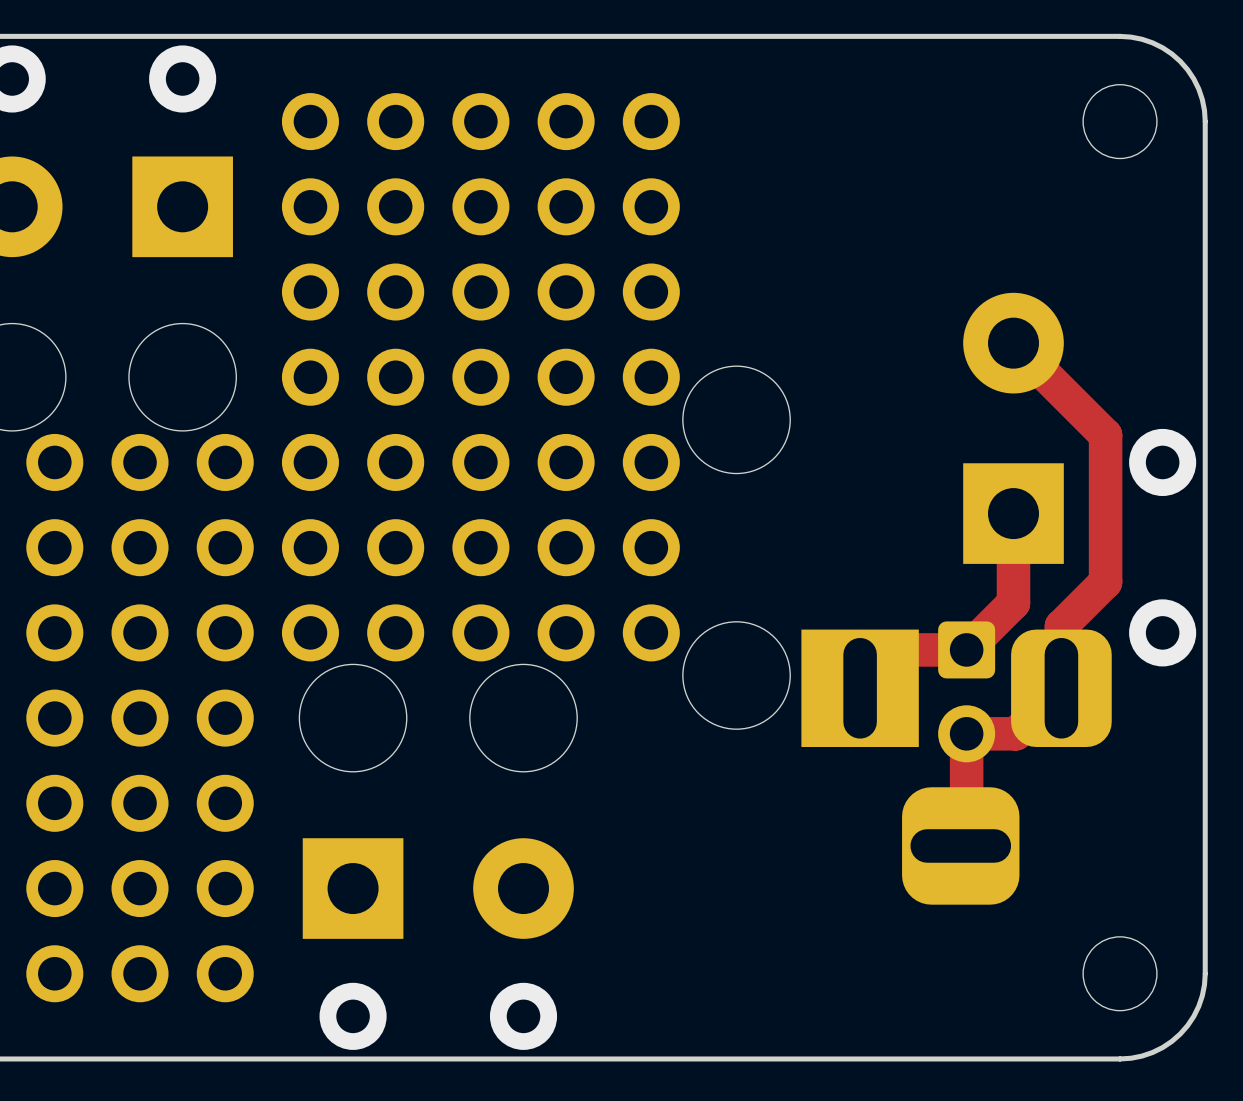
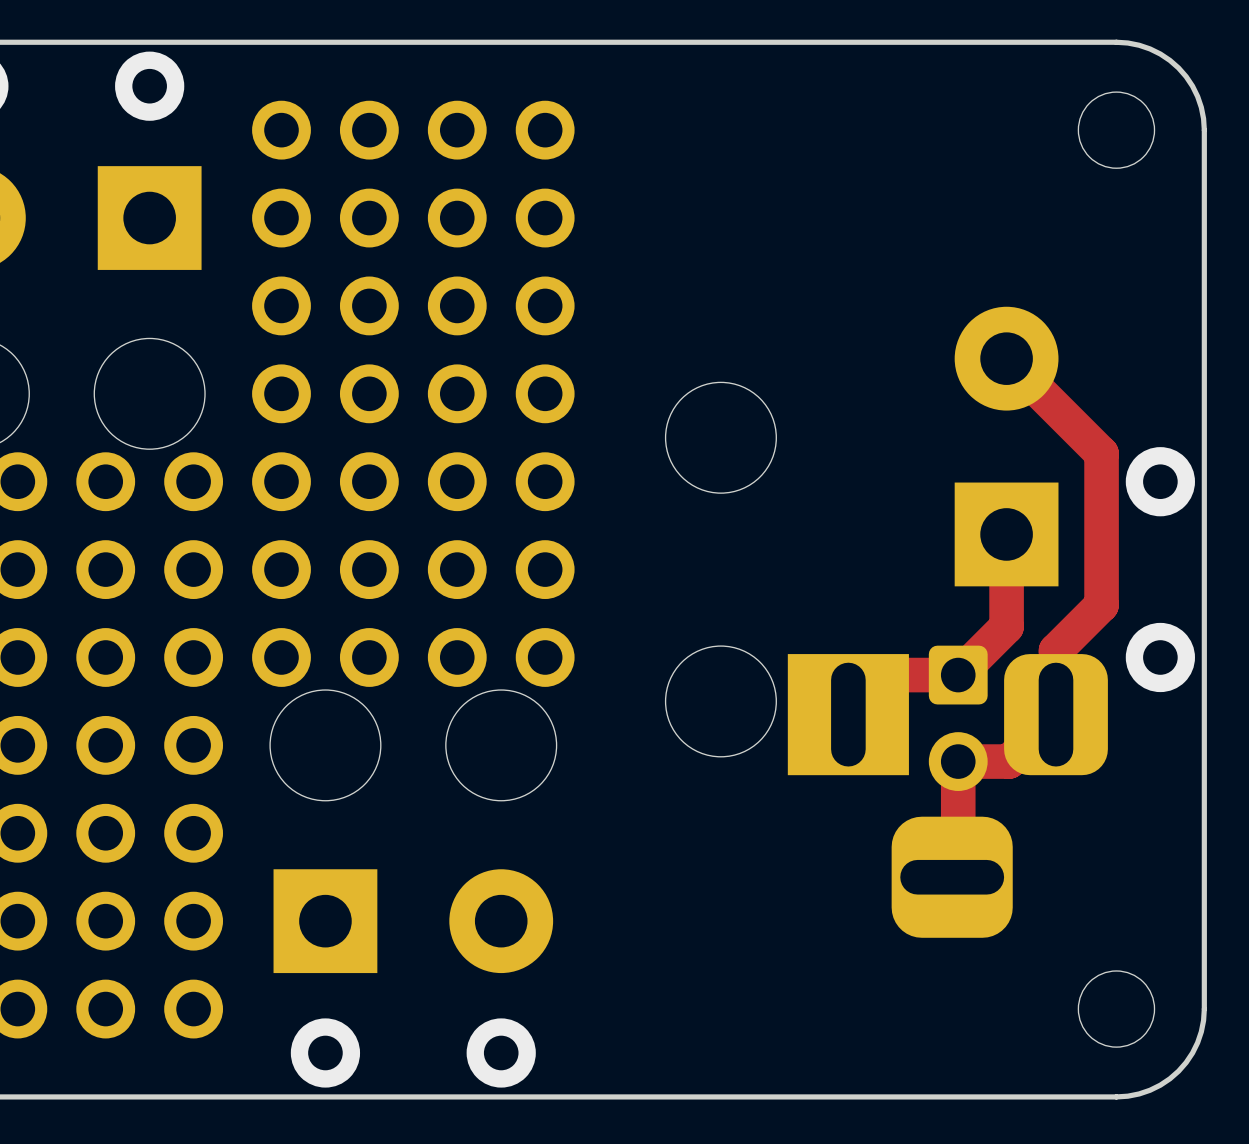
part: (480, 377) -> none

